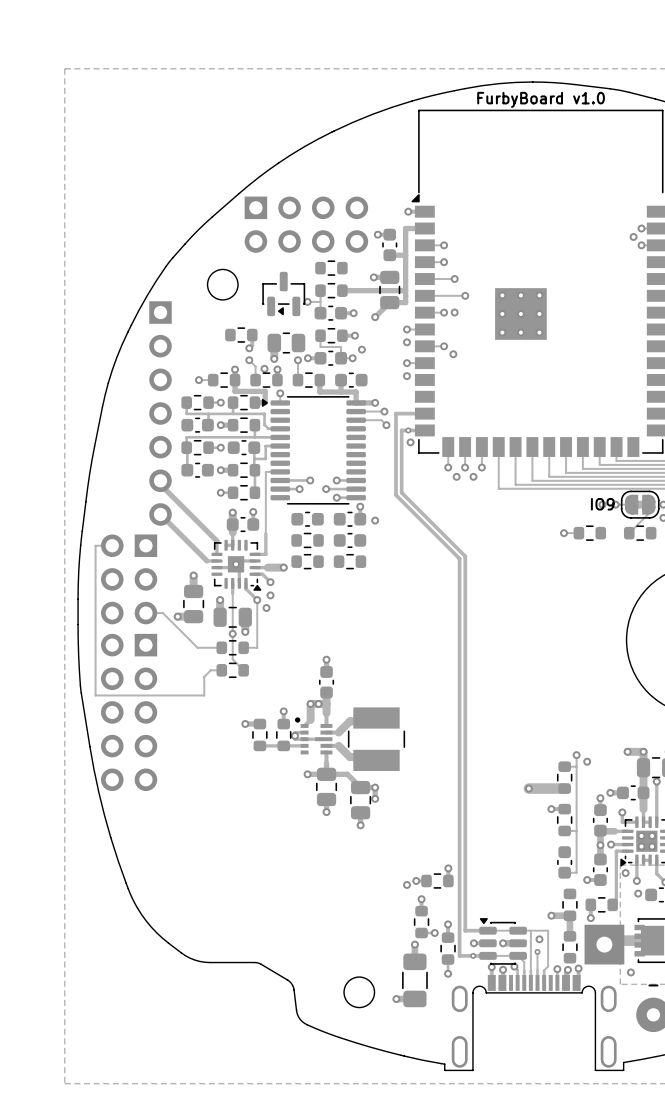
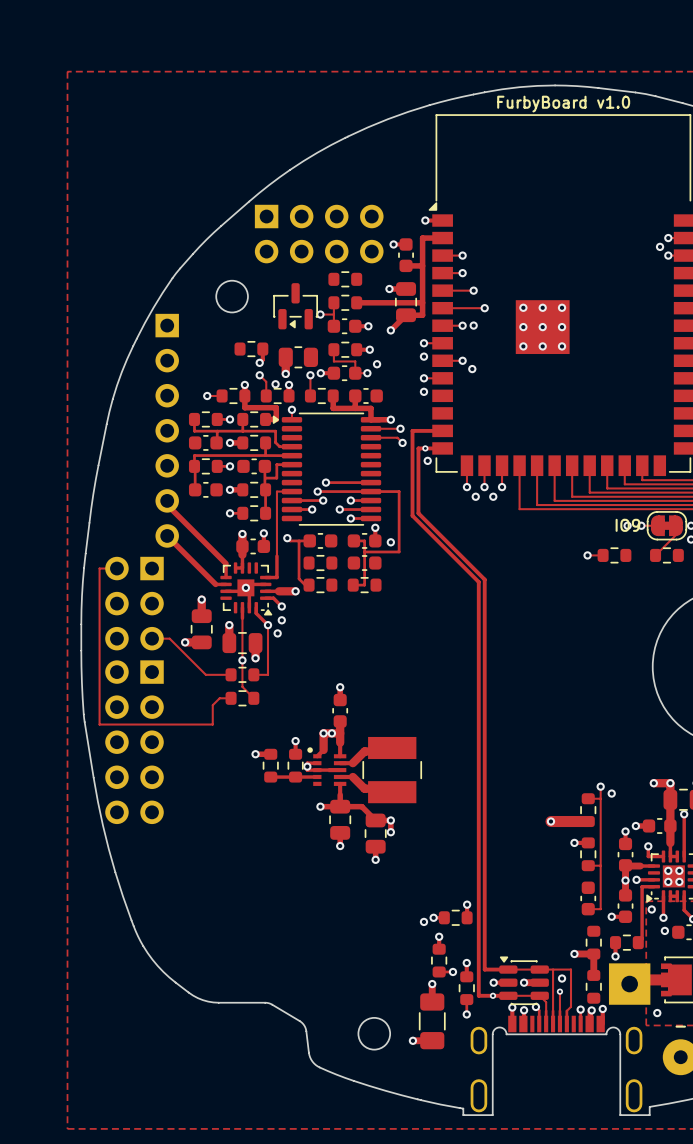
track: none -> (325, 482) (371, 482)
via: none -> (325, 482)
track: none -> (317, 491) (399, 491) (399, 551) (364, 551)
via: none -> (317, 491)
track: none -> (287, 538) (290, 540) (309, 540)
via: none -> (287, 538)
track: none -> (299, 540) (299, 578) (305, 585) (309, 585)
track: none -> (353, 540) (364, 540) (364, 585) (353, 585)

